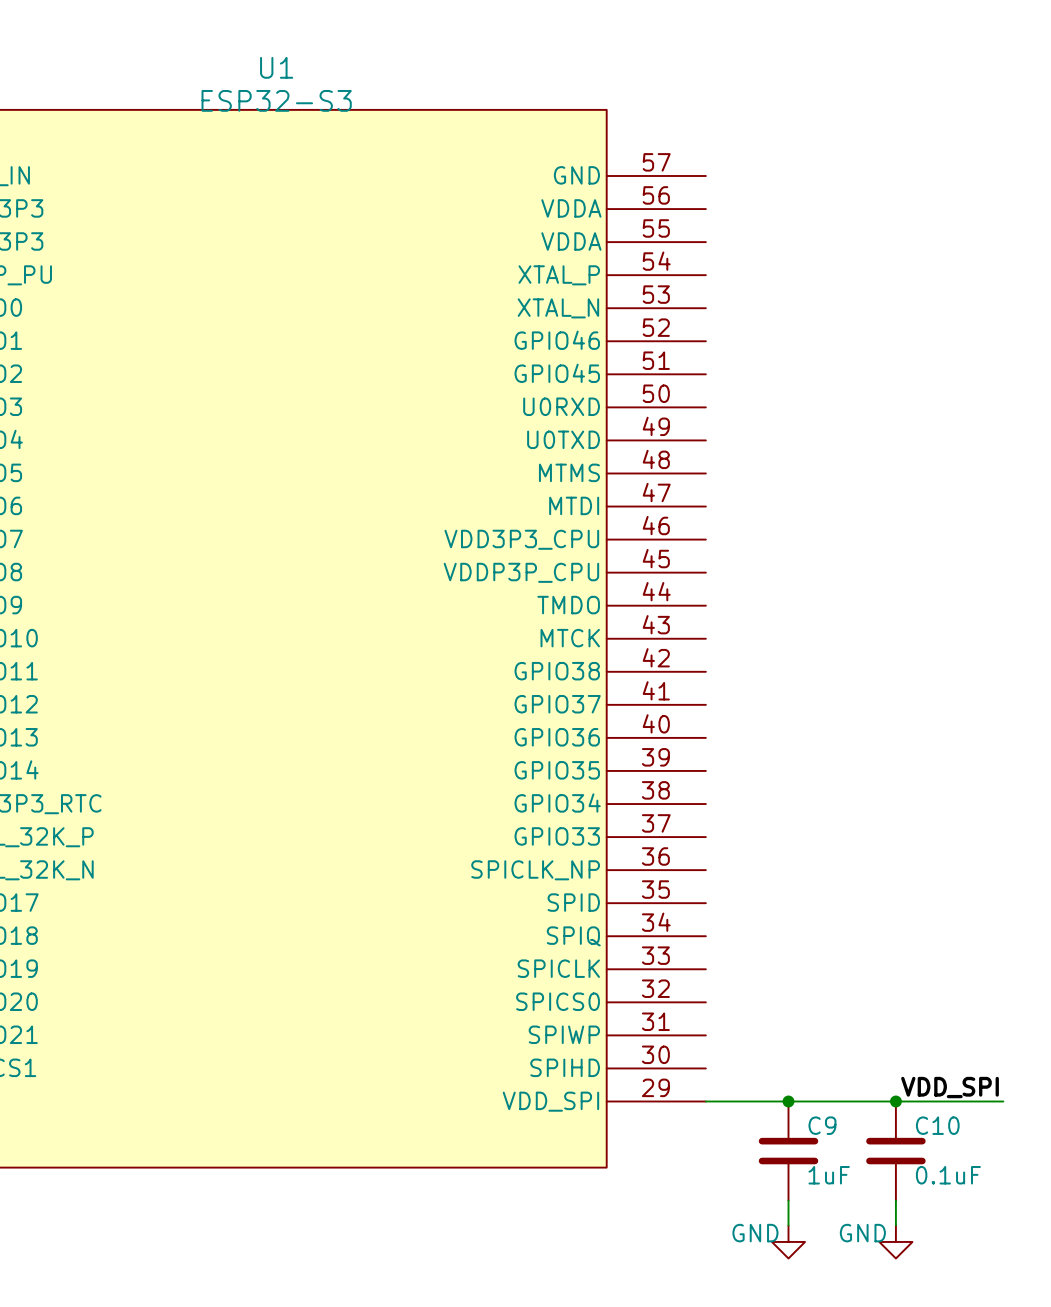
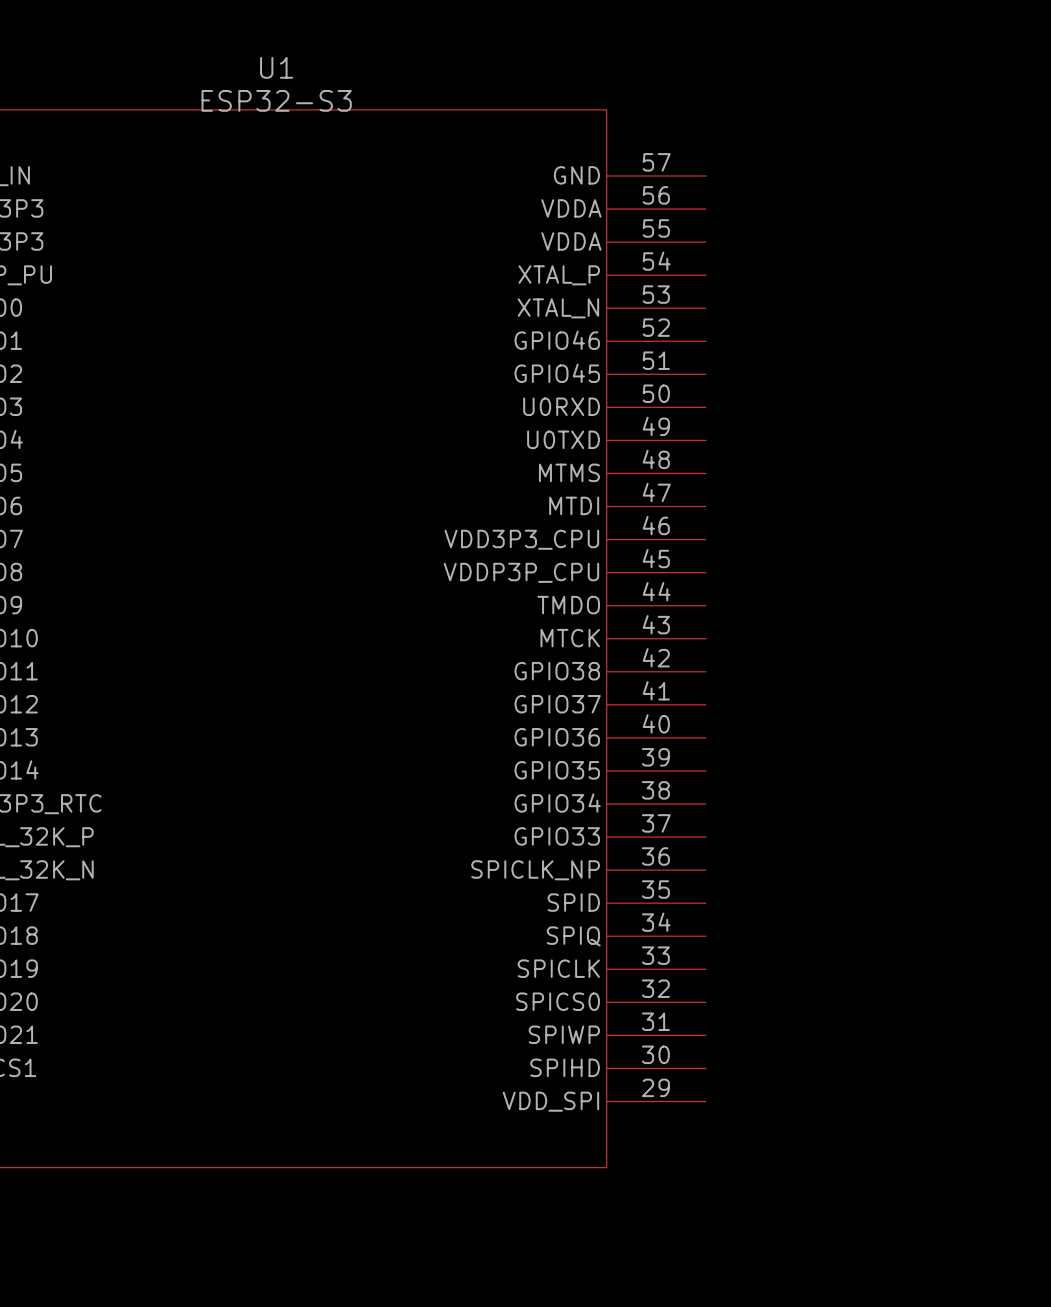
label: VDD_SPI (950, 1087) -> none
wire: (705, 1101) (1003, 1101) -> none
junction: (788, 1101) -> none
junction: (895, 1101) -> none
C9: 1uF (788, 1151) -> none
C10: 0.1uF (895, 1151) -> none
wire: (788, 1200) (788, 1225) -> none
wire: (895, 1200) (895, 1225) -> none
power symbol: GND (788, 1241) -> none
power symbol: GND (895, 1241) -> none

